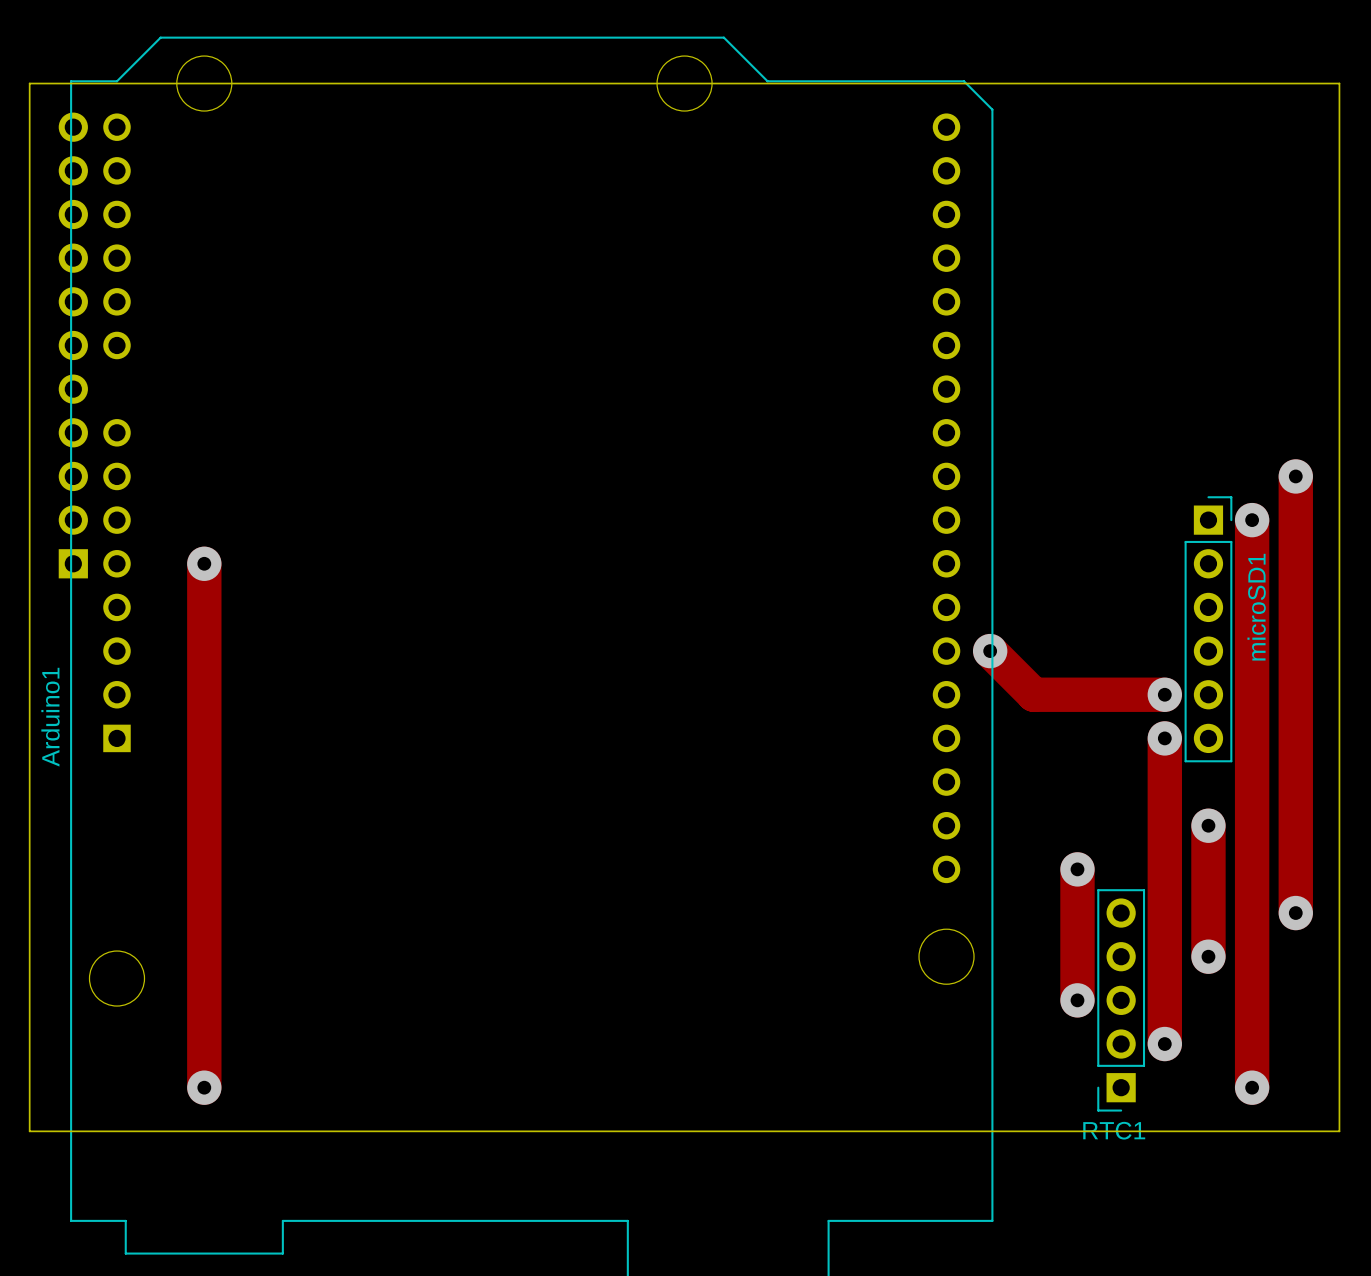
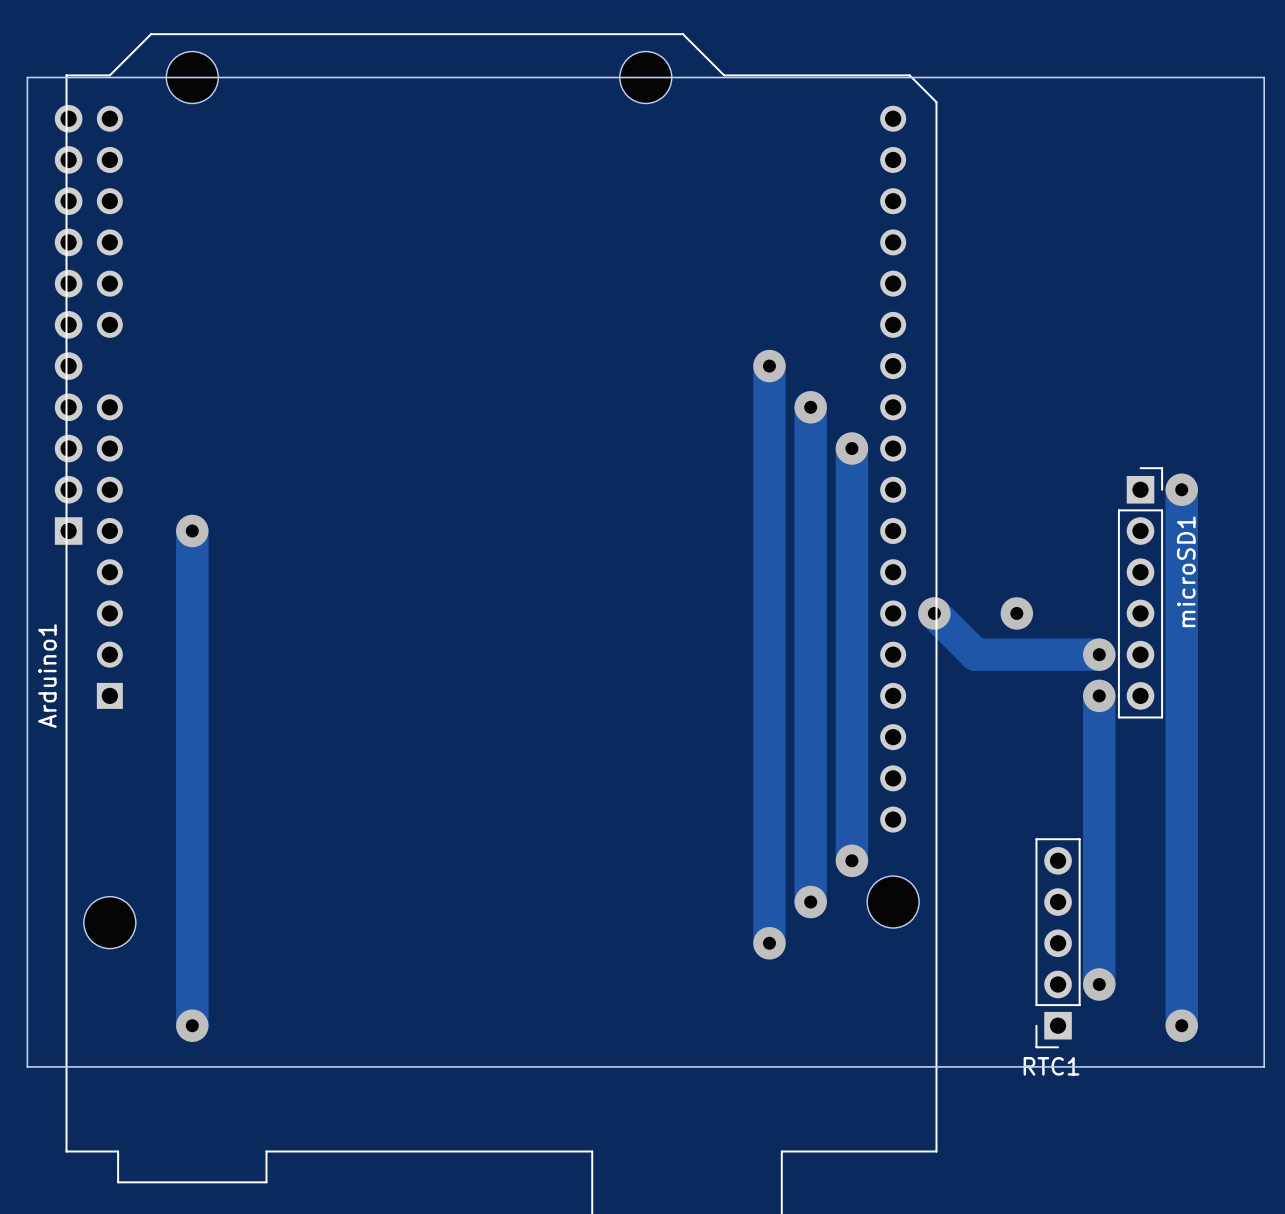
track: none -> (769, 366) (769, 943)
via: none -> (769, 366)
track: none -> (810, 407) (810, 902)
via: none -> (810, 407)
via: none -> (851, 448)
track: (1295, 476) (1295, 913) -> (851, 448) (851, 860)
via: (1295, 476) -> none
via: none -> (1016, 613)
track: (1208, 825) (1208, 956) -> none
via: (1208, 825) -> none
track: (1077, 869) (1077, 1000) -> none
via: (1077, 869) -> none
via: none -> (851, 860)
via: (1295, 913) -> none
via: none -> (810, 902)
via: (1208, 956) -> none
via: none -> (769, 943)
via: (1077, 1000) -> none

